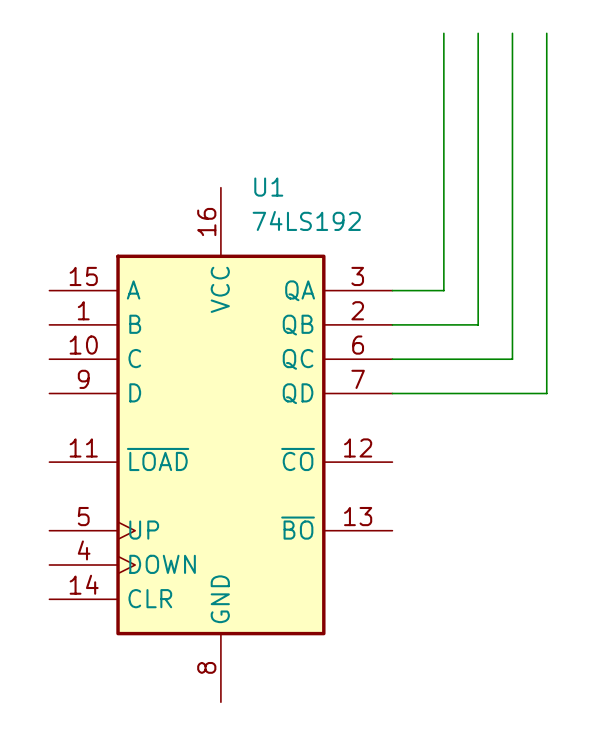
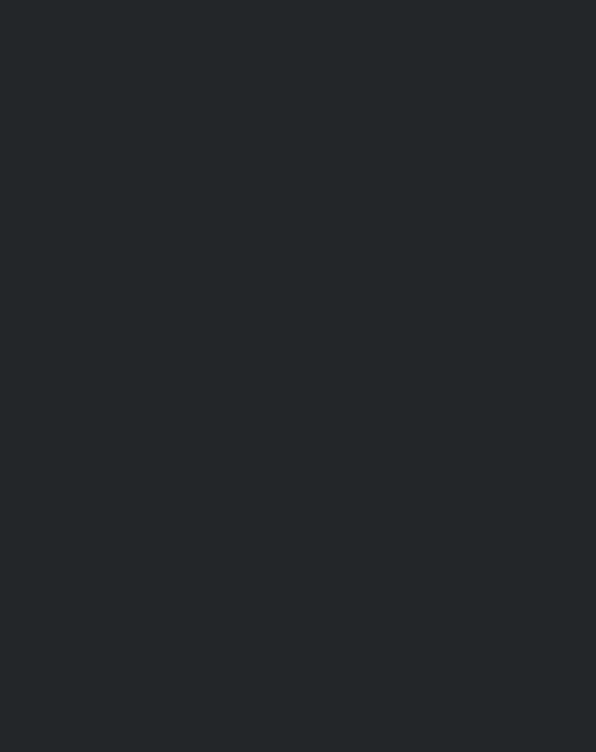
wire: (443, 33) (443, 290) (392, 290) -> none
wire: (478, 33) (478, 324) (392, 324) -> none
wire: (512, 33) (512, 359) (392, 359) -> none
wire: (546, 33) (546, 393) (392, 393) -> none
U1: 74LS192 (220, 444) -> none

